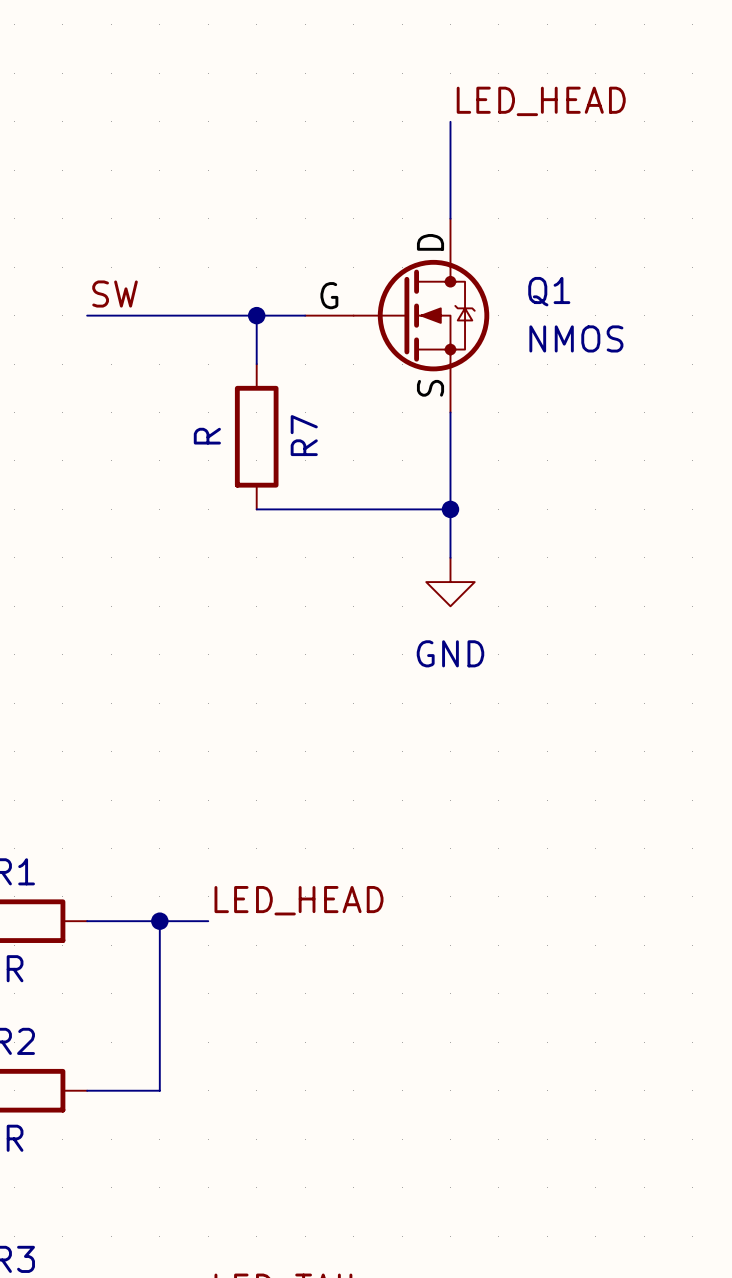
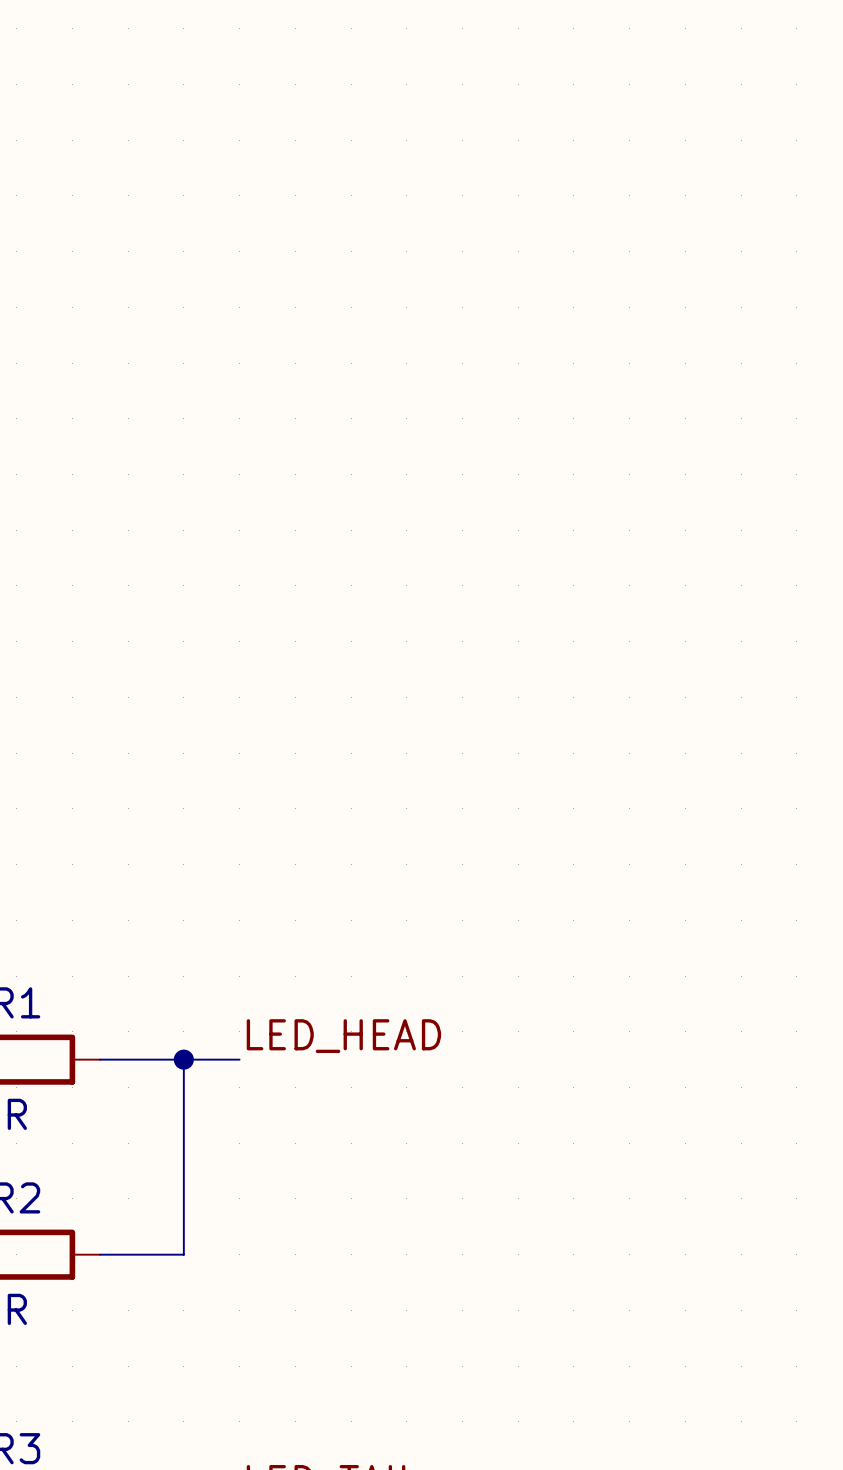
label: LED_HEAD (541, 101) -> none
wire: (450, 121) (450, 218) -> none
label: SW (115, 294) -> none
wire: (87, 315) (305, 315) -> none
wire: (256, 315) (256, 364) -> none
junction: (256, 315) -> none
Q1: NMOS (397, 315) -> none
wire: (450, 412) (450, 557) -> none
R7: R (256, 436) -> none
wire: (256, 509) (450, 509) -> none
junction: (450, 509) -> none
power symbol: GND (450, 582) -> none

